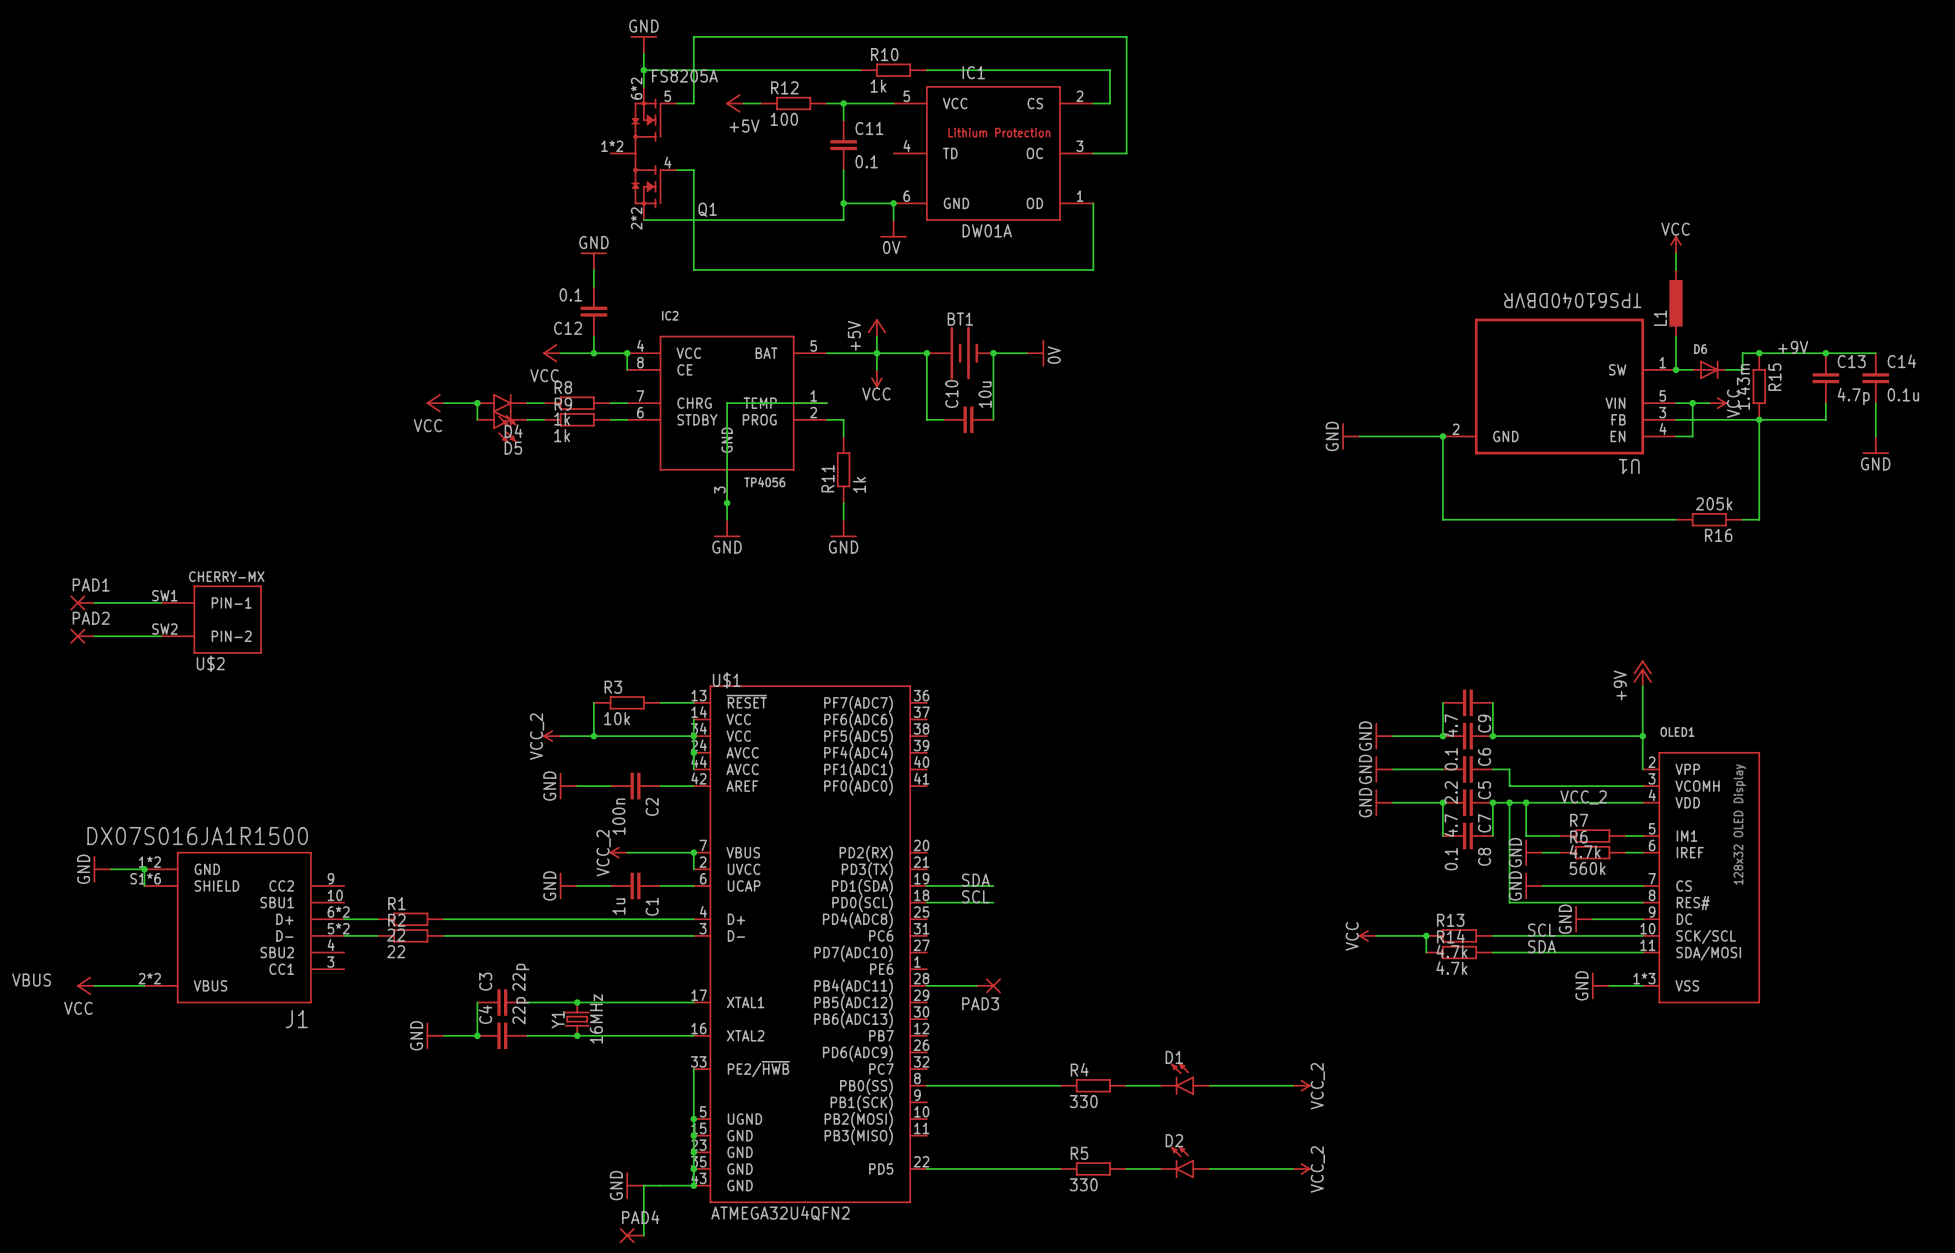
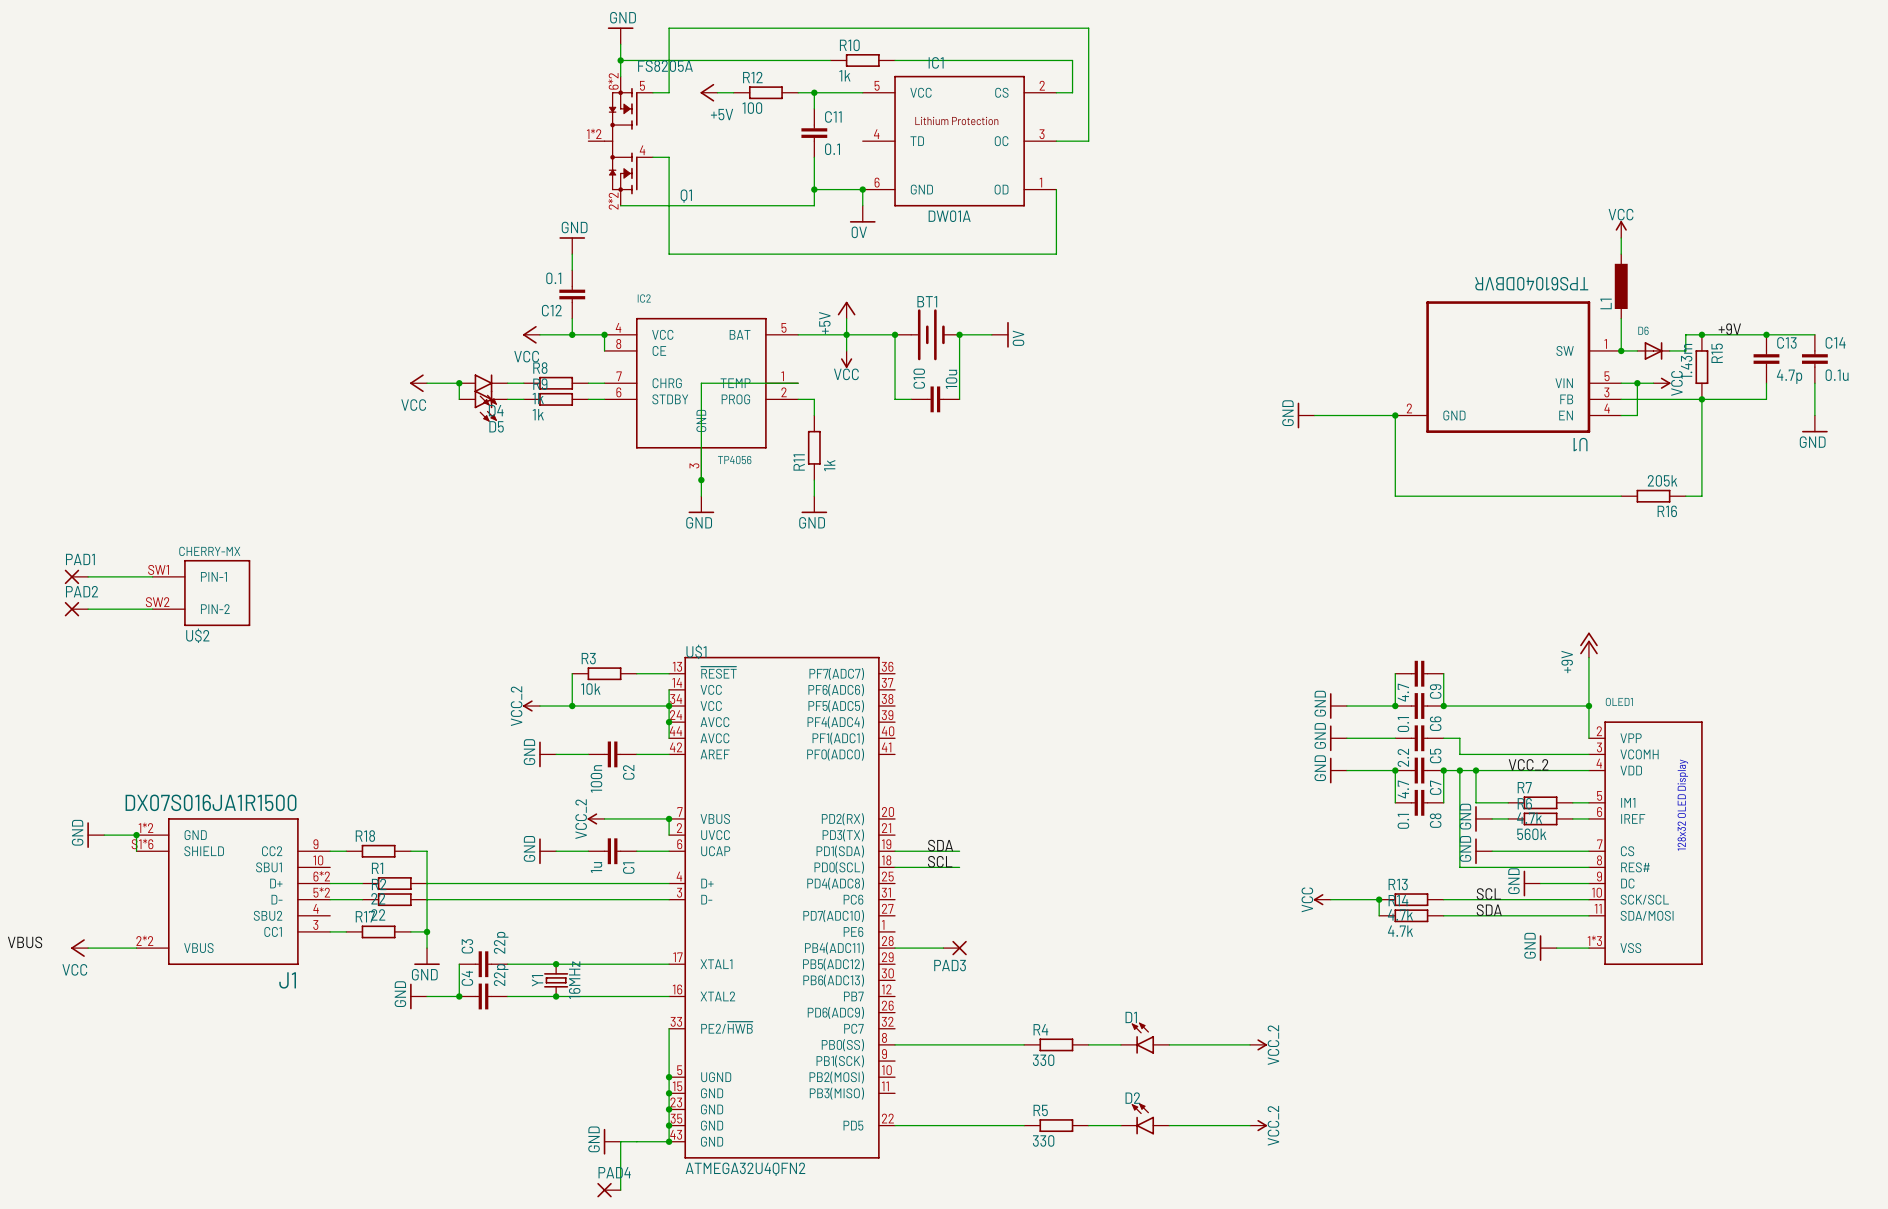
wire: none -> (330, 851) (346, 851)
R18: none -> (378, 851)
wire: none -> (410, 851) (427, 851) (427, 948)
wire: none -> (330, 931) (346, 931)
R17: none -> (378, 931)
wire: none -> (410, 931) (427, 931)
junction: none -> (427, 931)
power symbol: none -> GND (427, 956)

